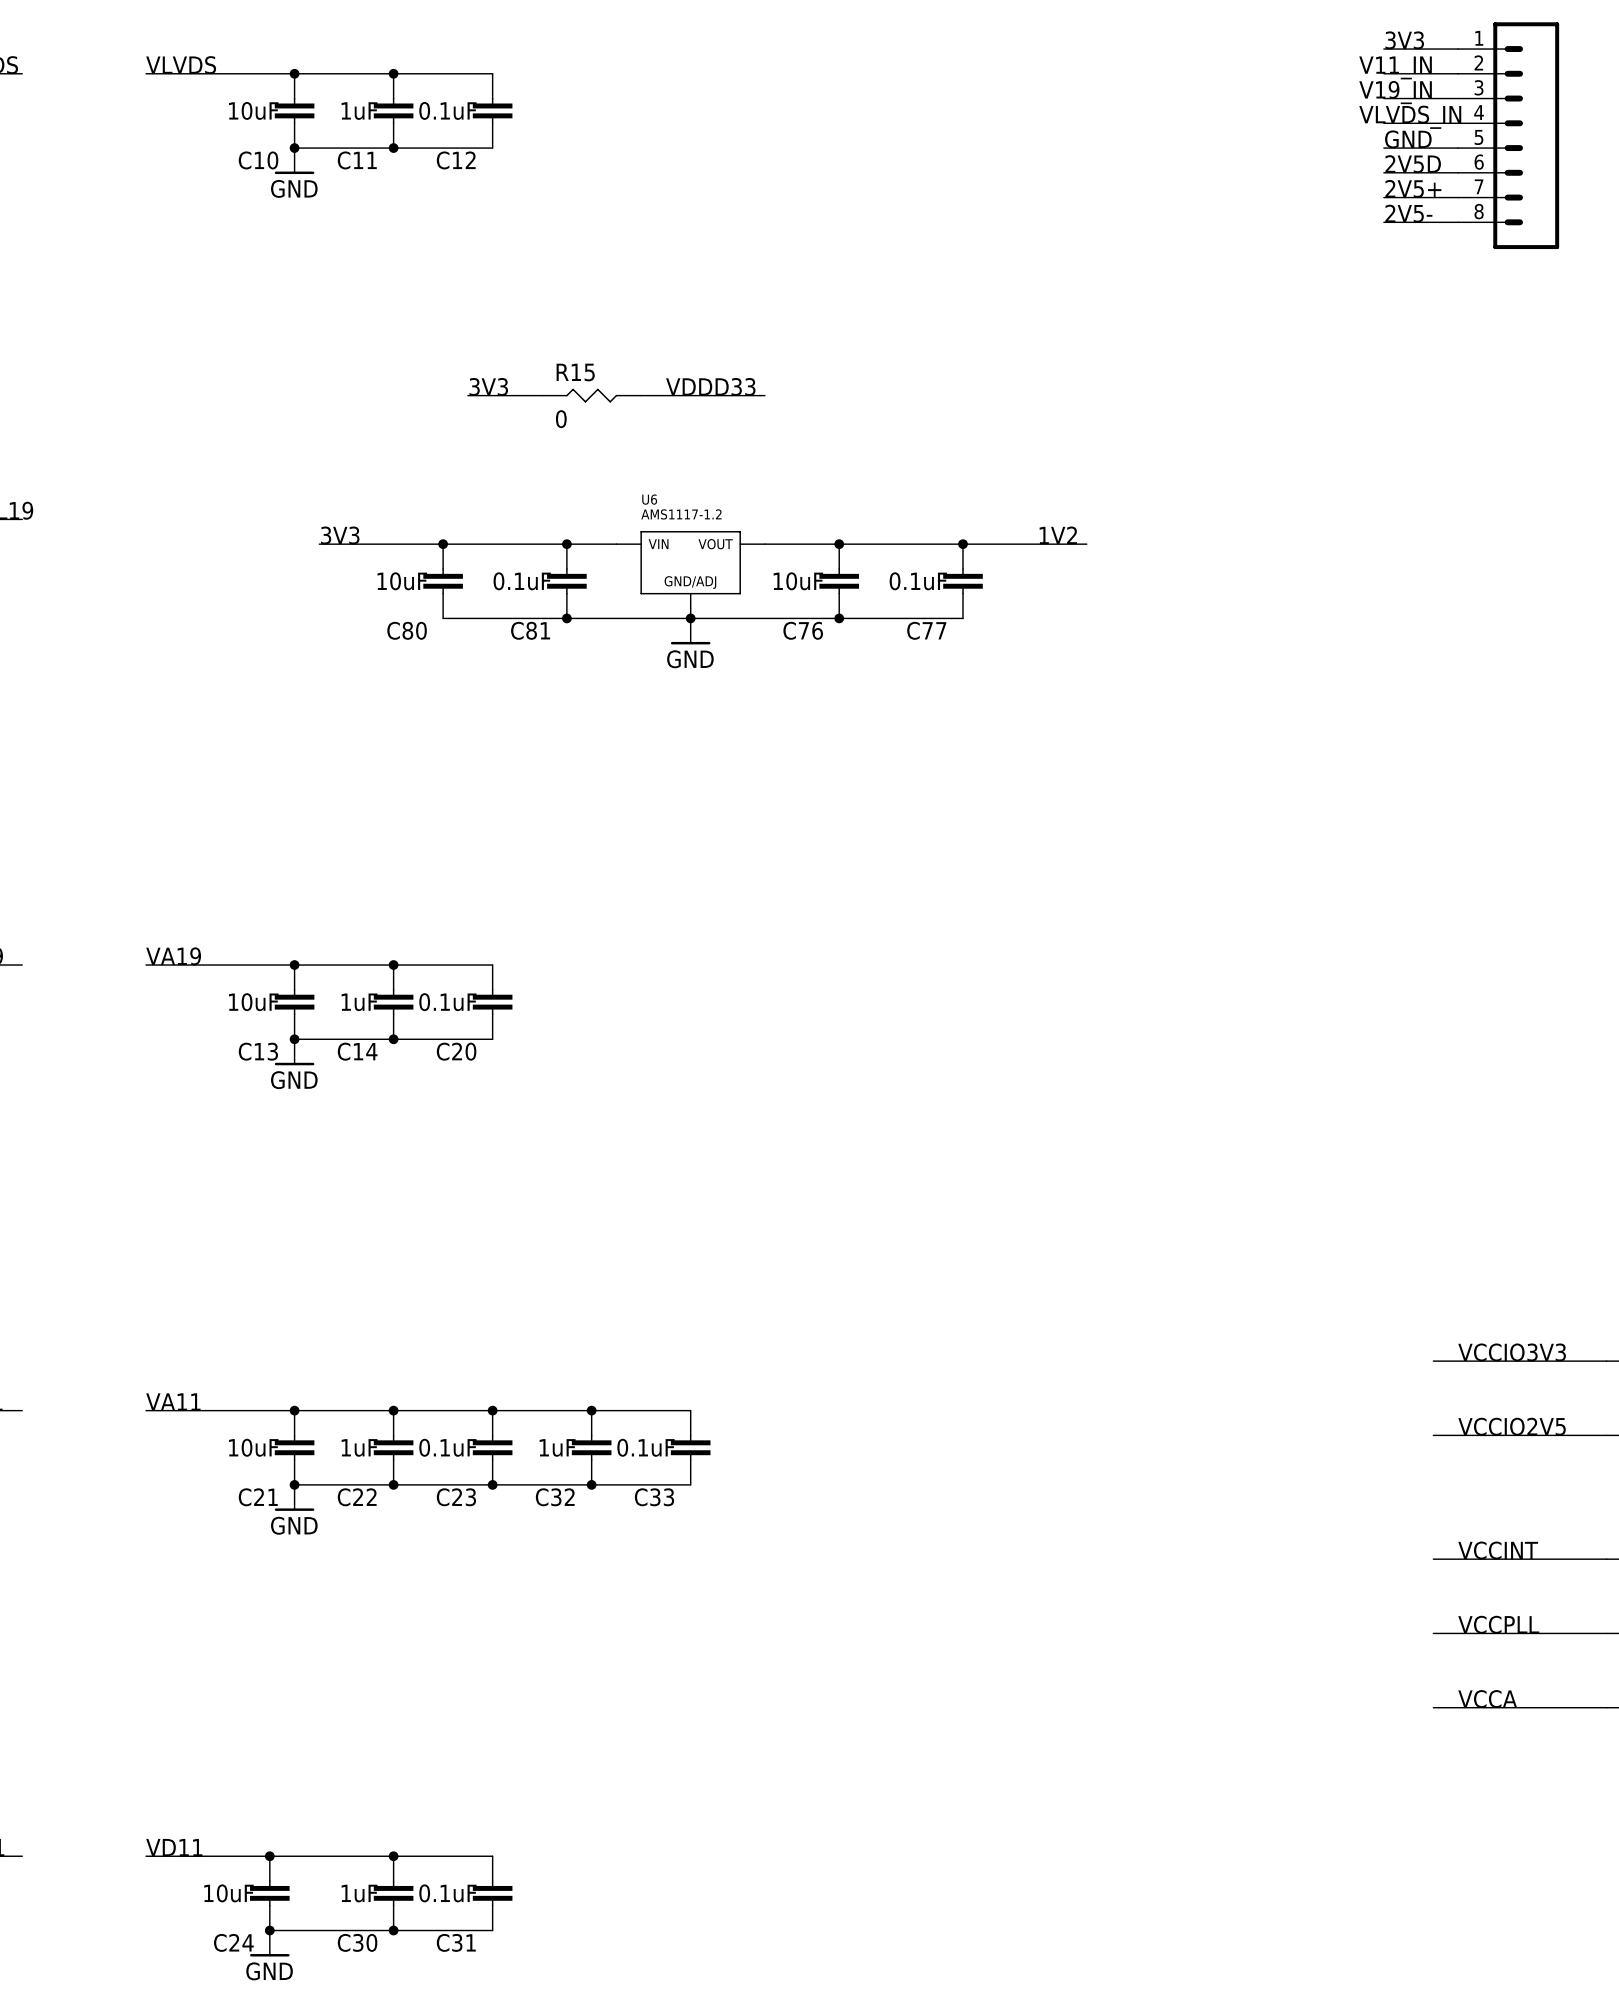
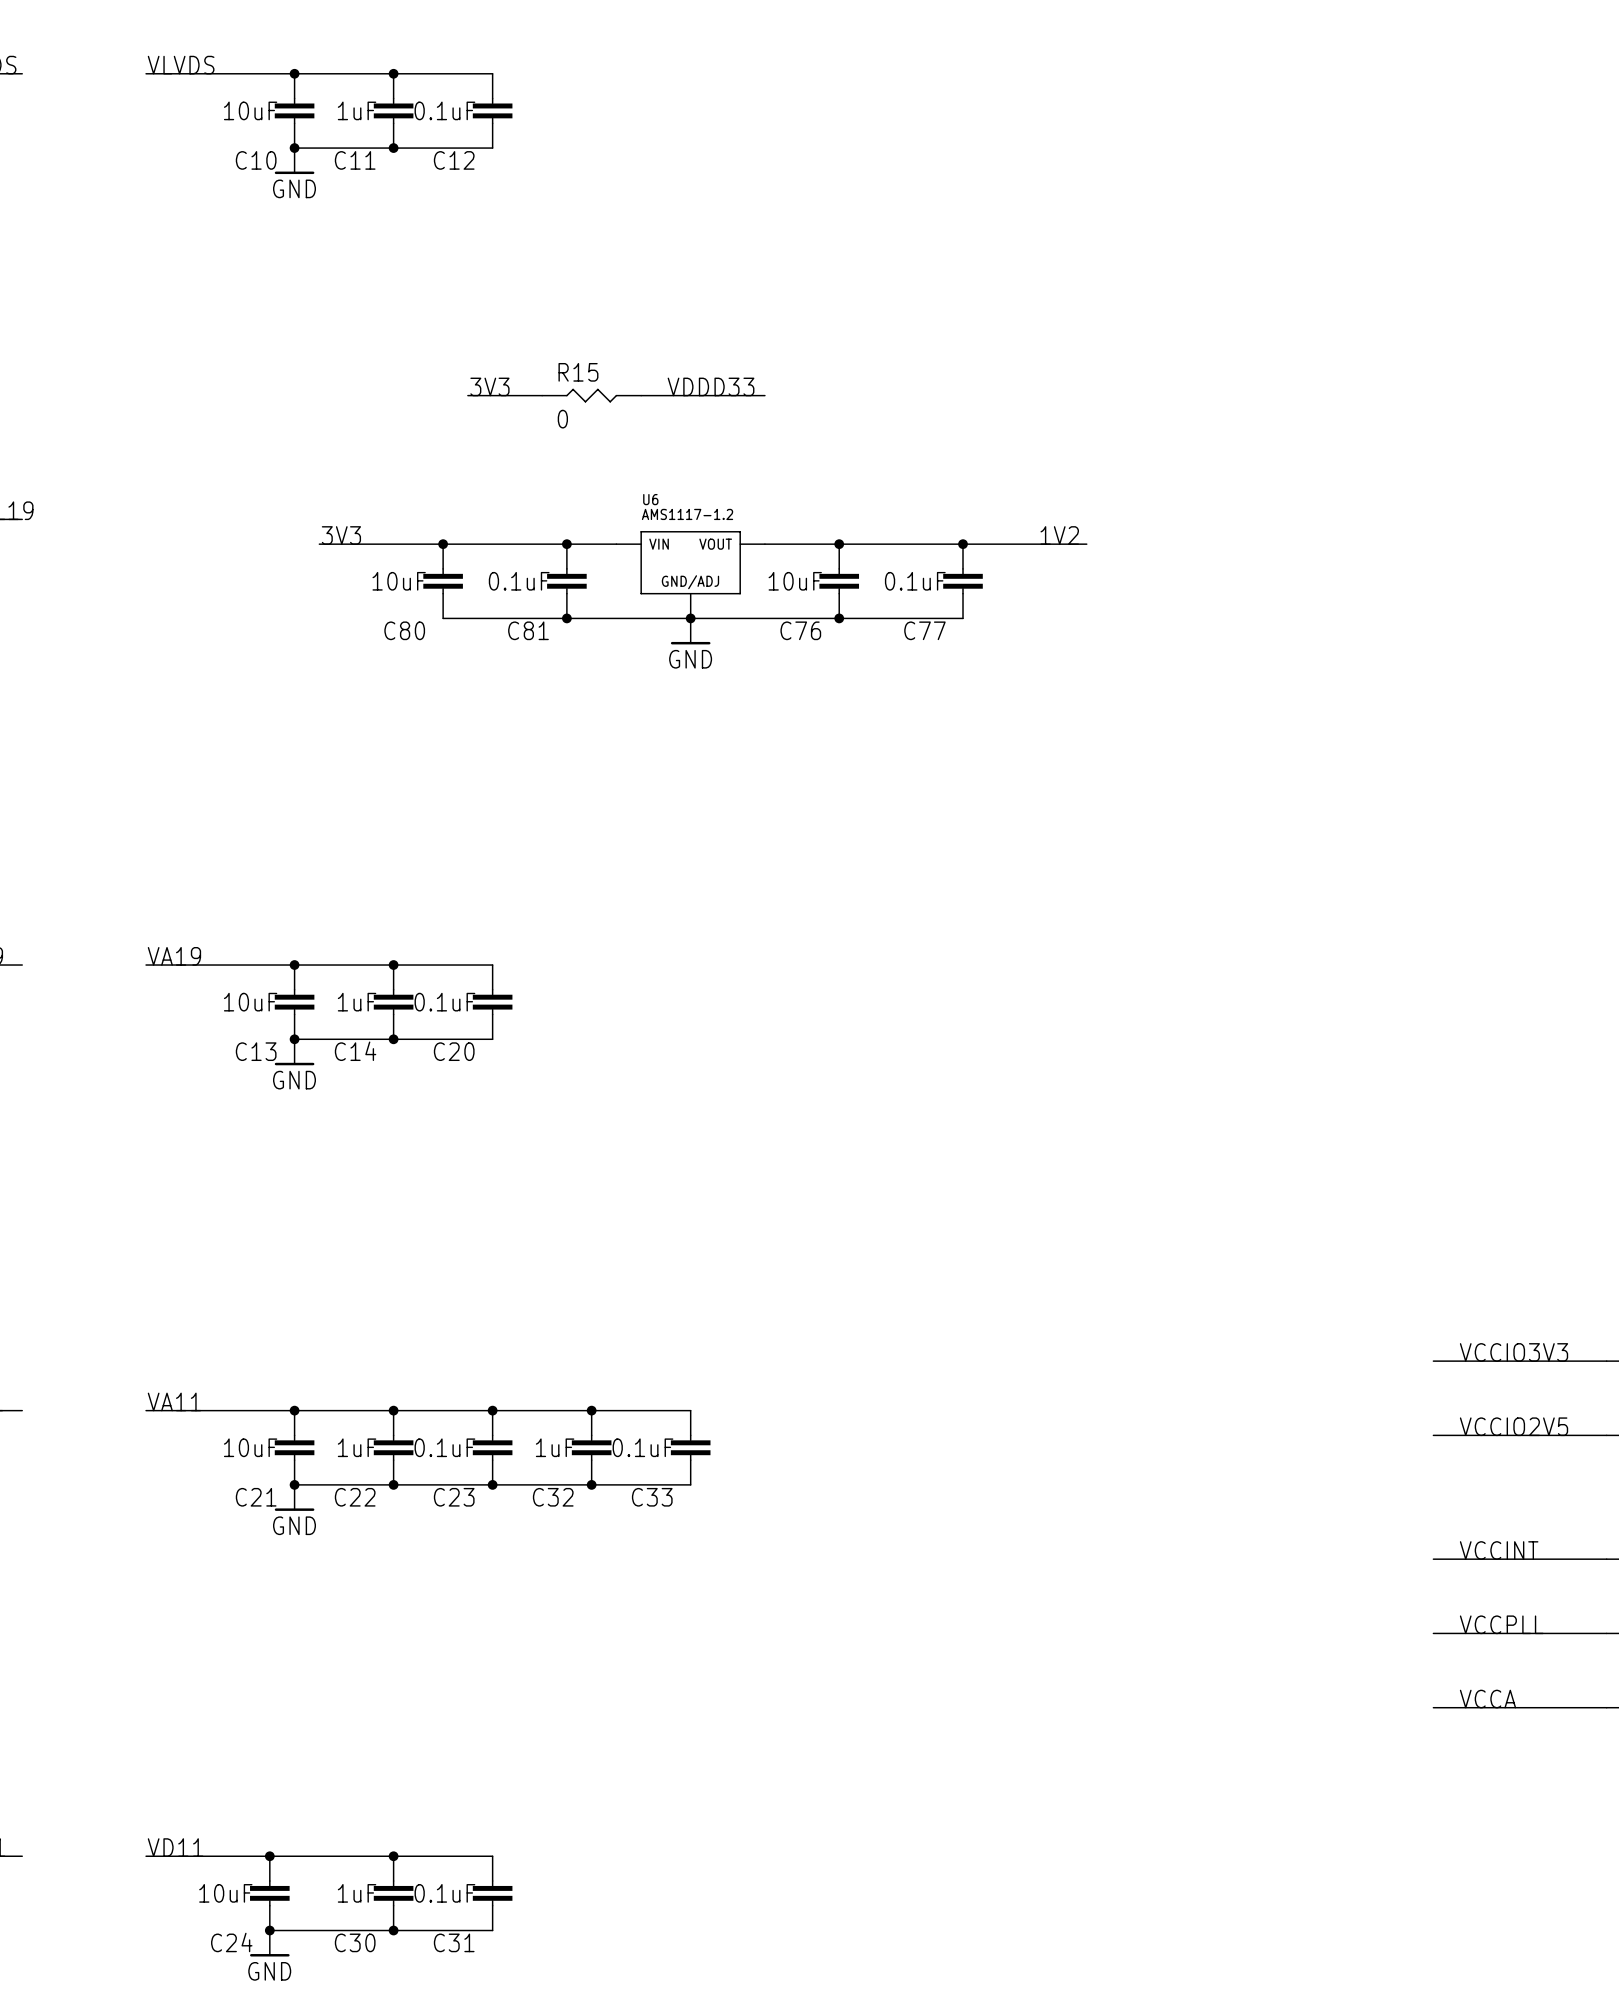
label: 3V3 (1404, 40) -> none
wire: (1383, 49) (1458, 49) -> none
label: V11_IN (1395, 67) -> none
wire: (1383, 73) (1458, 73) -> none
label: V19_IN (1395, 92) -> none
wire: (1383, 98) (1458, 98) -> none
label: VLVDS_IN (1410, 117) -> none
wire: (1383, 123) (1458, 123) -> none
part: (1508, 135) -> none
label: GND (1408, 139) -> none
wire: (1383, 148) (1458, 148) -> none
label: 2V5D (1413, 164) -> none
wire: (1383, 172) (1458, 172) -> none
label: 2V5+ (1413, 188) -> none
wire: (1383, 197) (1458, 197) -> none
label: 2V5- (1408, 213) -> none
wire: (1383, 222) (1458, 222) -> none

